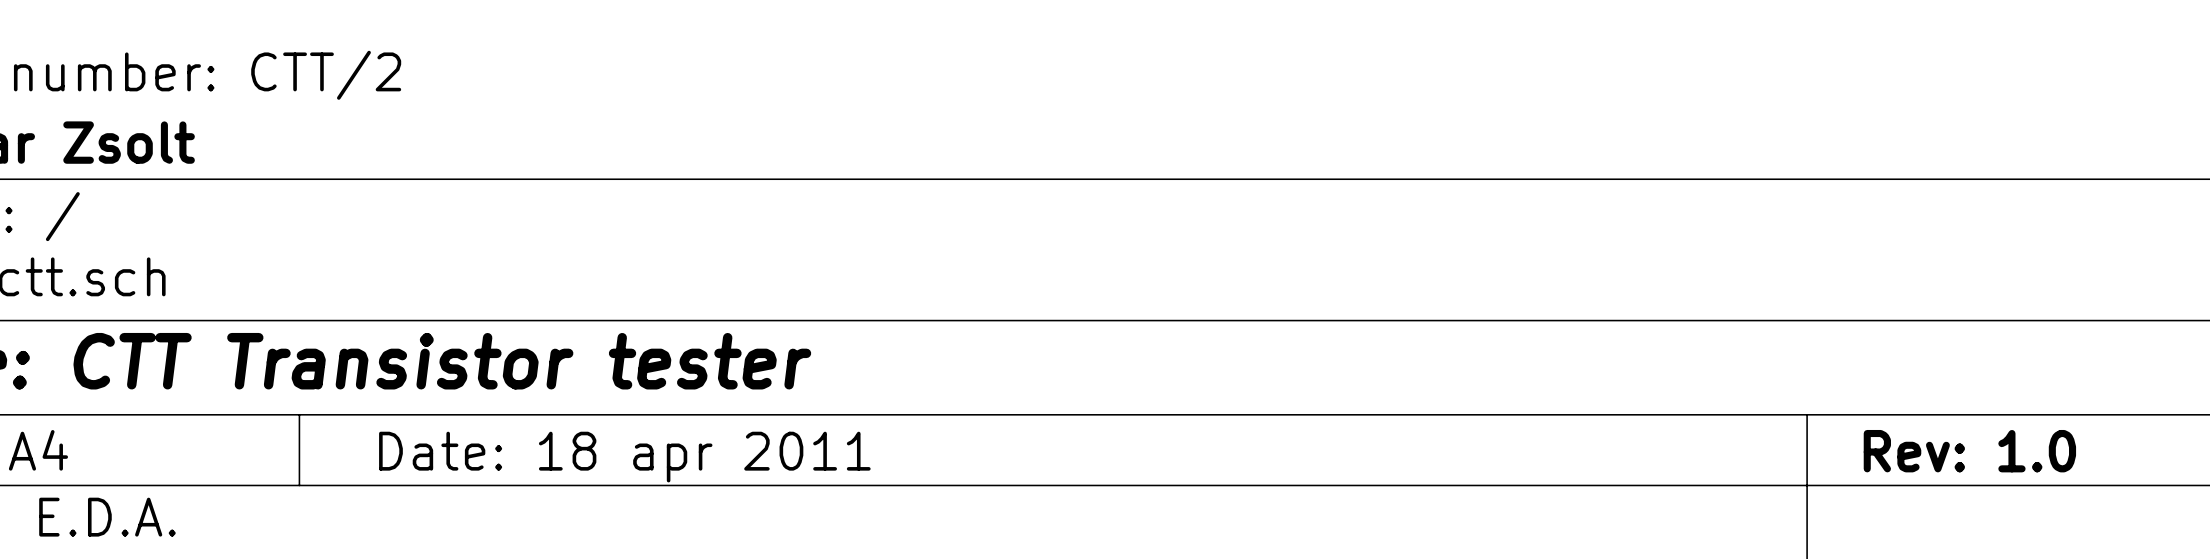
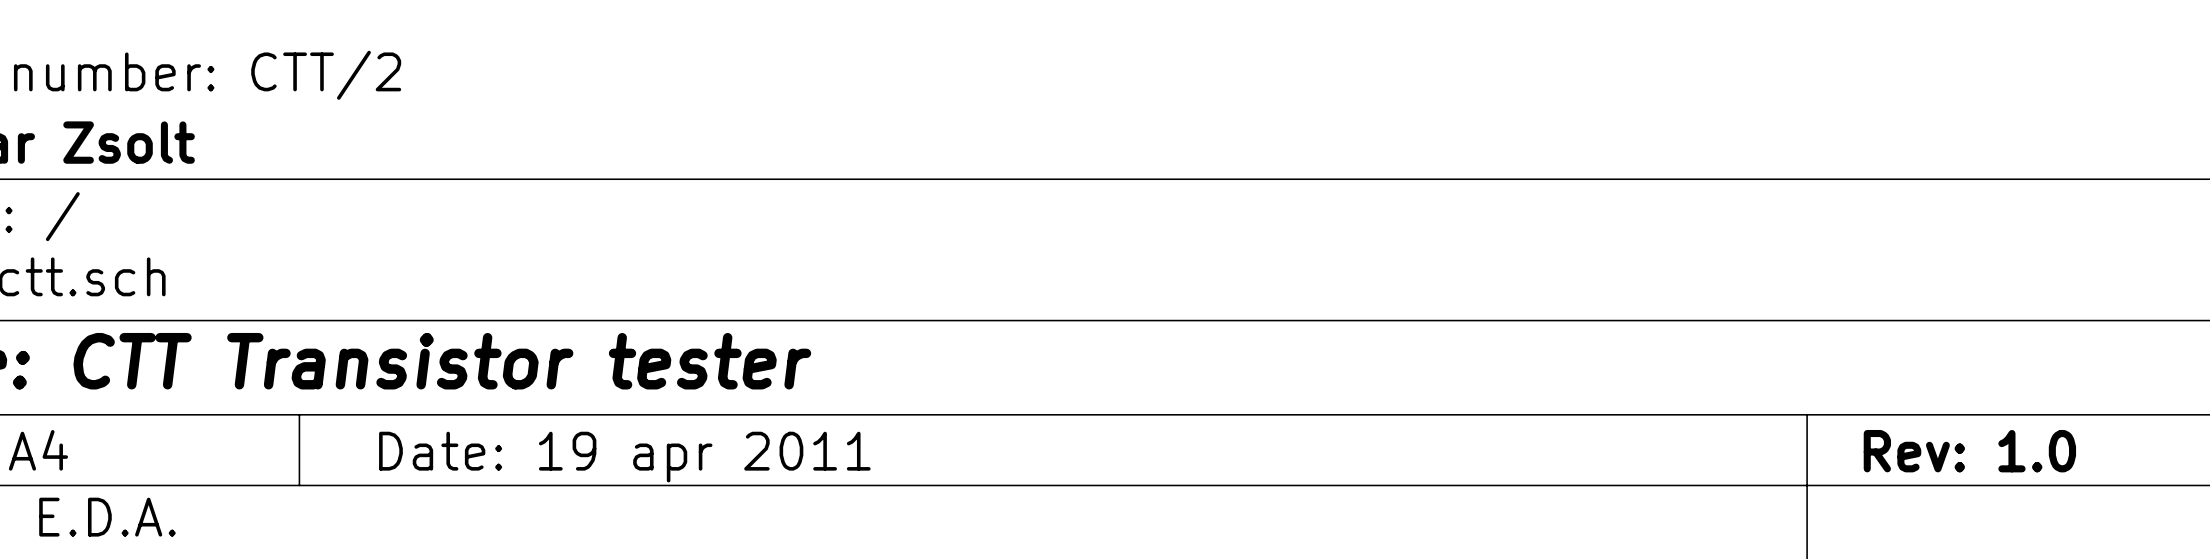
title block: Date: 18 apr 2011 (624, 457) -> Date: 19 apr 2011 (624, 457)

